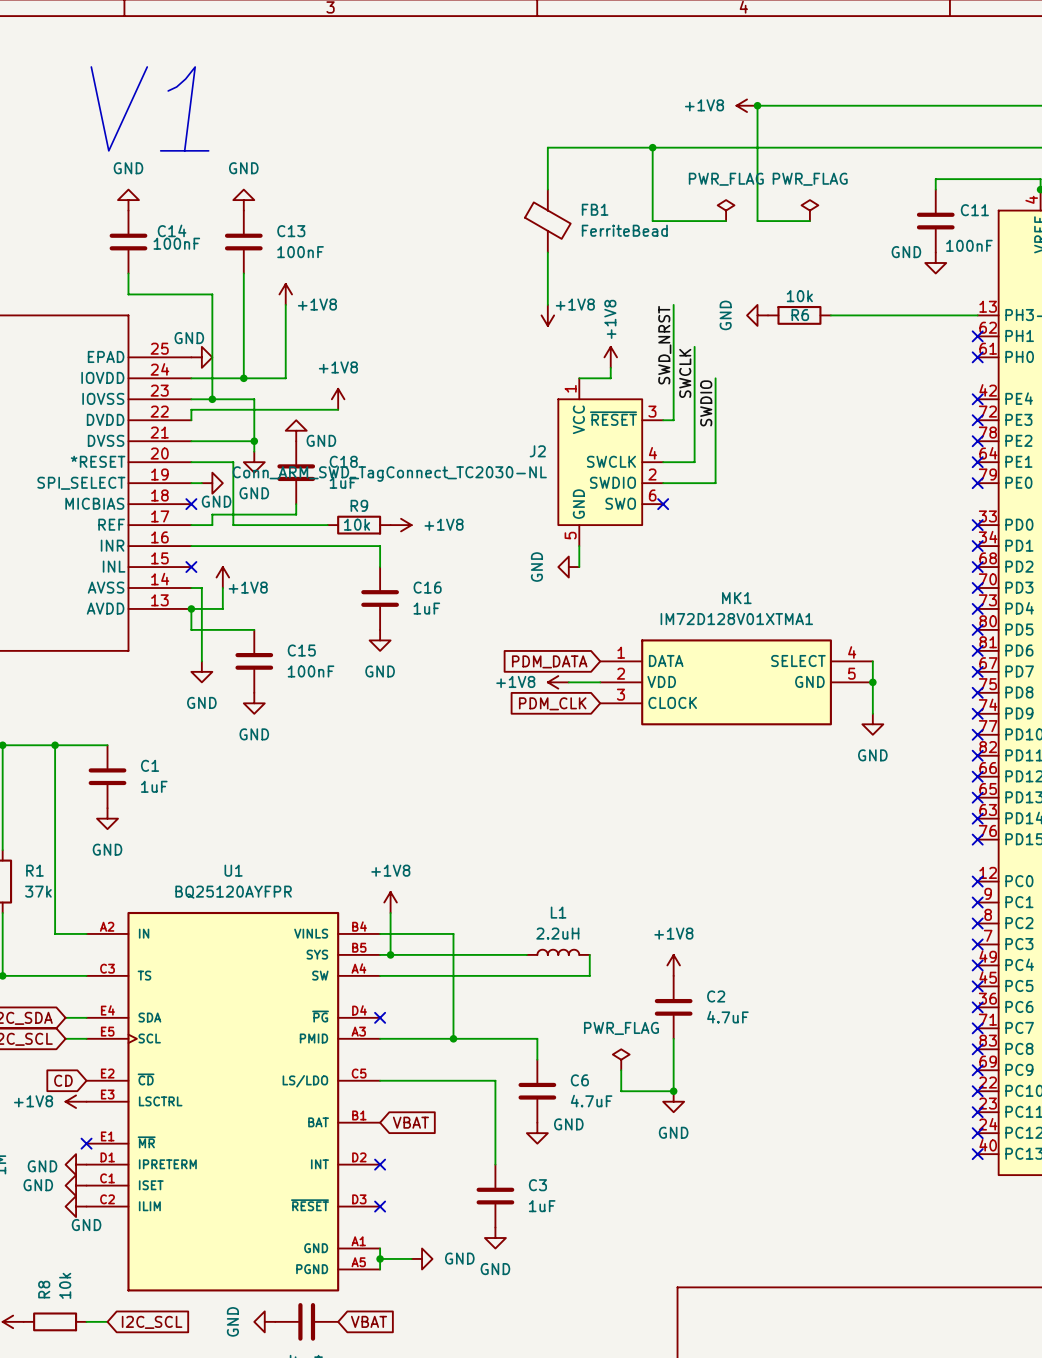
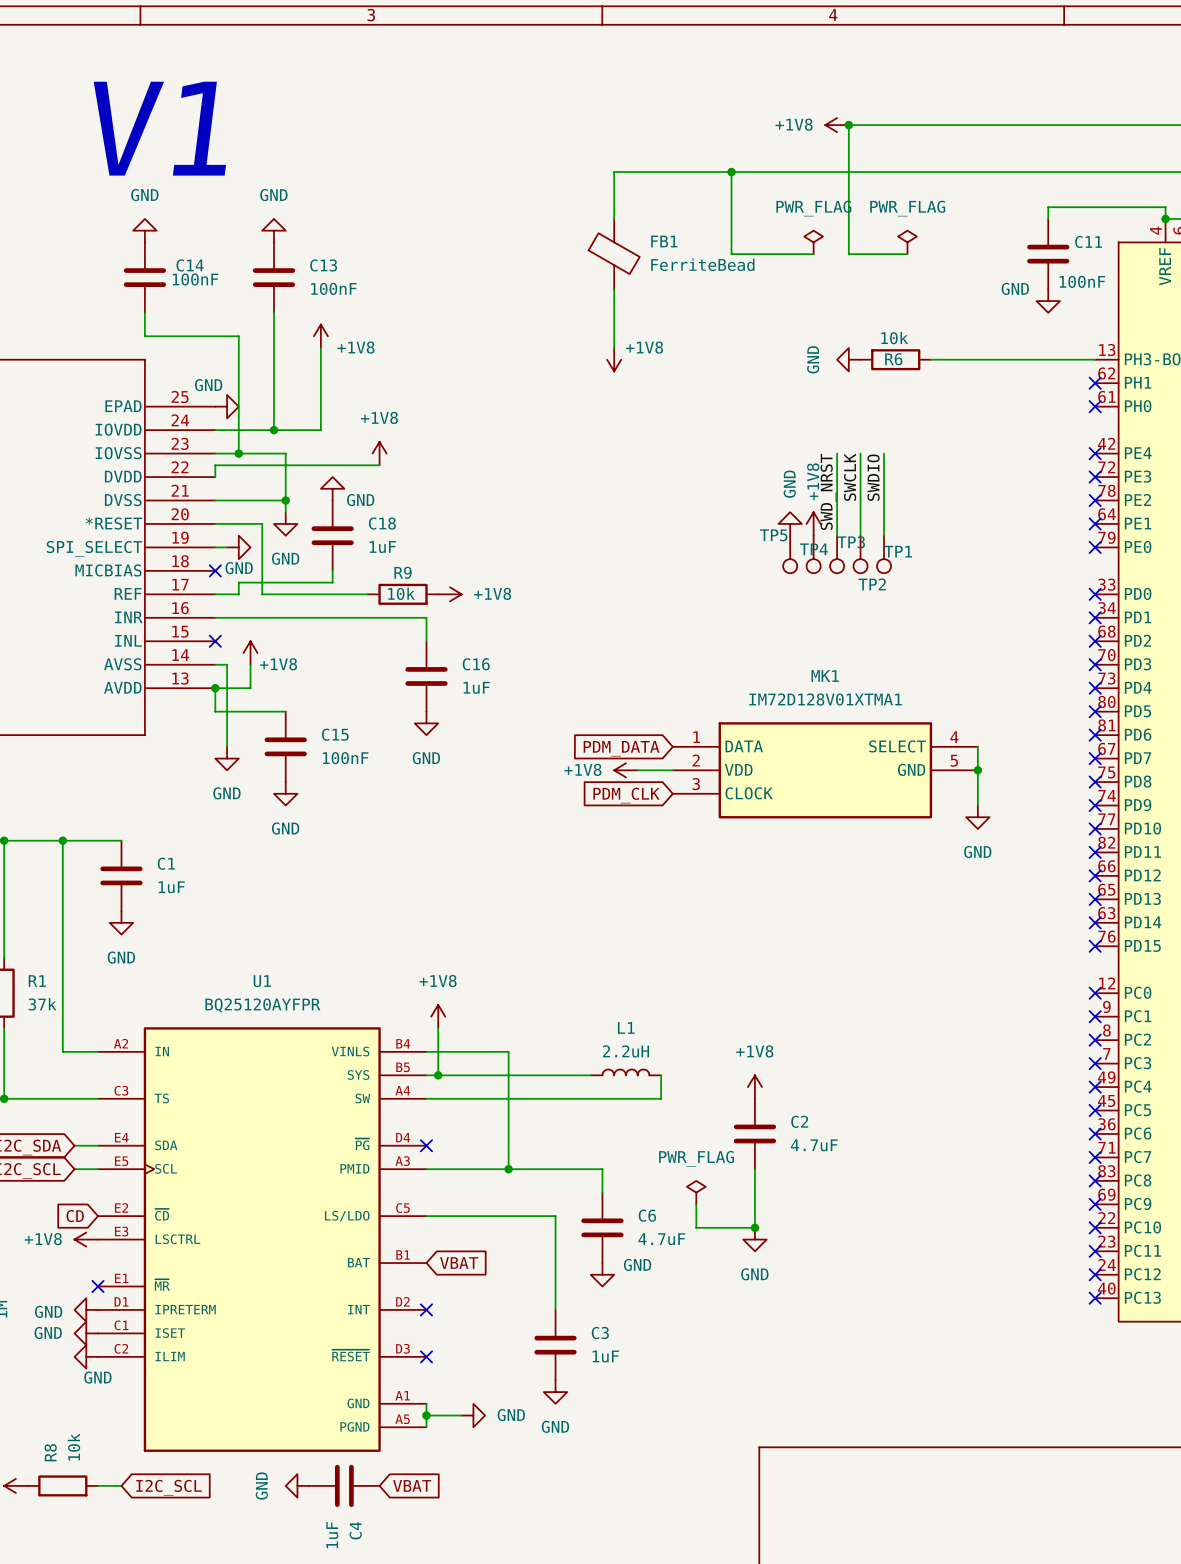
wire: (673, 304) (673, 420) (663, 420) -> none
label position: SWD_NRST (664, 345) -> SWD_NRST (828, 491)
wire: (694, 346) (694, 462) (663, 462) -> none
power symbol position: +1V8 (610, 357) -> +1V8 (813, 523)
wire: (610, 367) (610, 378) (579, 378) -> none
label position: SWCLK (685, 373) -> SWCLK (850, 477)
wire: (715, 378) (715, 483) (663, 483) -> none
wire: none -> (837, 453) (837, 535)
wire: none -> (860, 453) (860, 535)
wire: none -> (884, 453) (884, 535)
label position: SWDIO (706, 403) -> SWDIO (873, 477)
J2: Conn_ARM_SWD_TagConnect_TC2030-NL (610, 462) -> none
TP5: none -> (790, 554)
TP4: none -> (813, 554)
TP3: none -> (837, 554)
TP2: none -> (860, 554)
TP1: none -> (884, 554)
no-connect mark: (663, 504) -> none
wire: (579, 546) (579, 567) -> none
power symbol rotation: 0° (568, 567) -> 90° clockwise (790, 523)
power symbol position: GND (568, 567) -> GND (790, 523)

